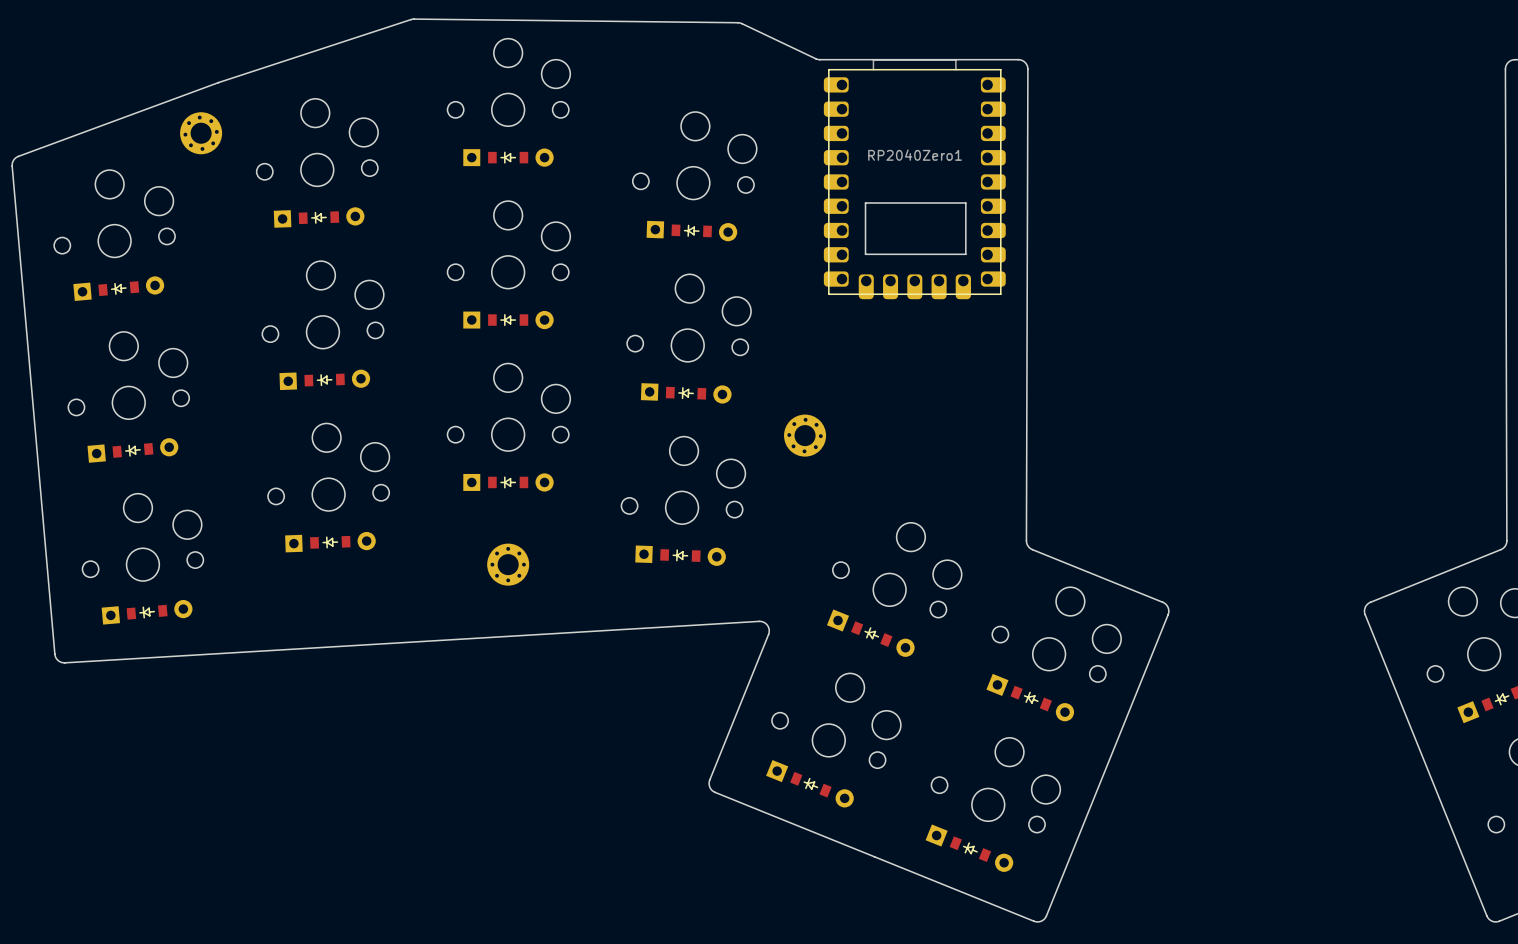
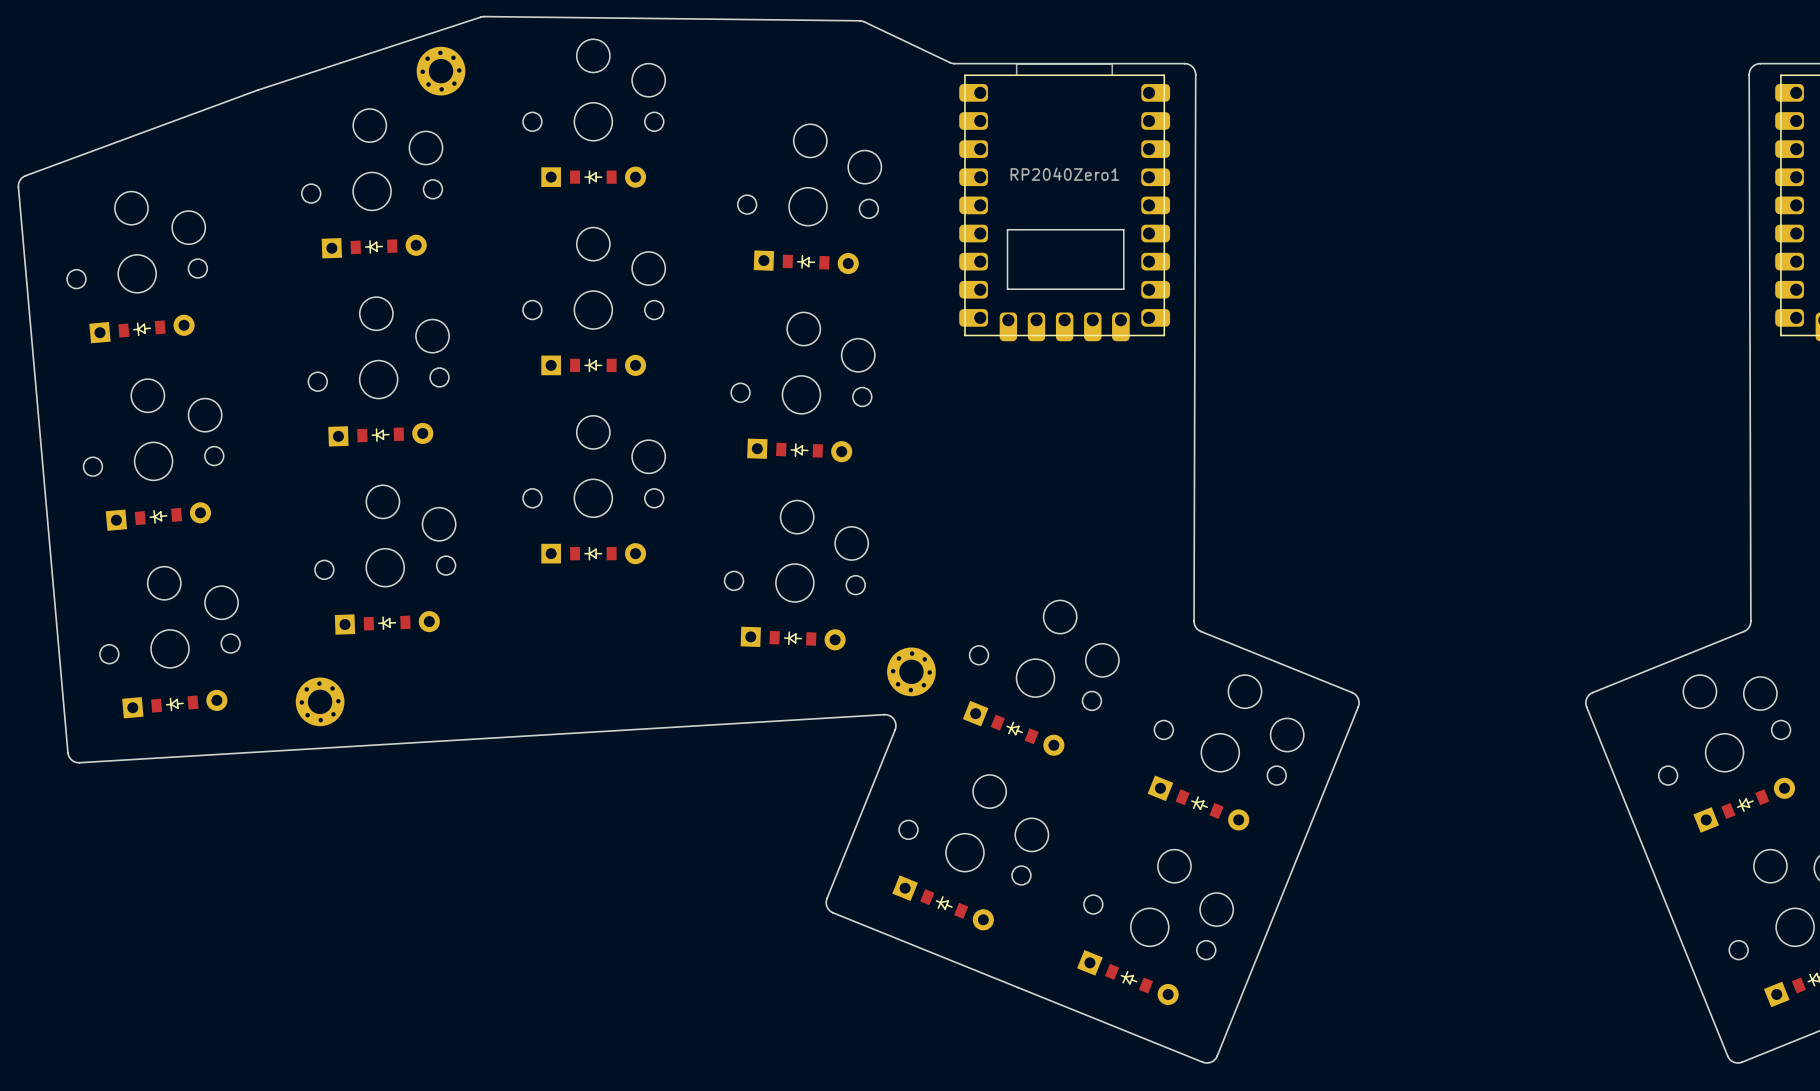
part: none -> (441, 71)
part: (201, 133) -> none
part position: (805, 435) -> (911, 671)
part: (508, 564) -> none
part: none -> (320, 701)

